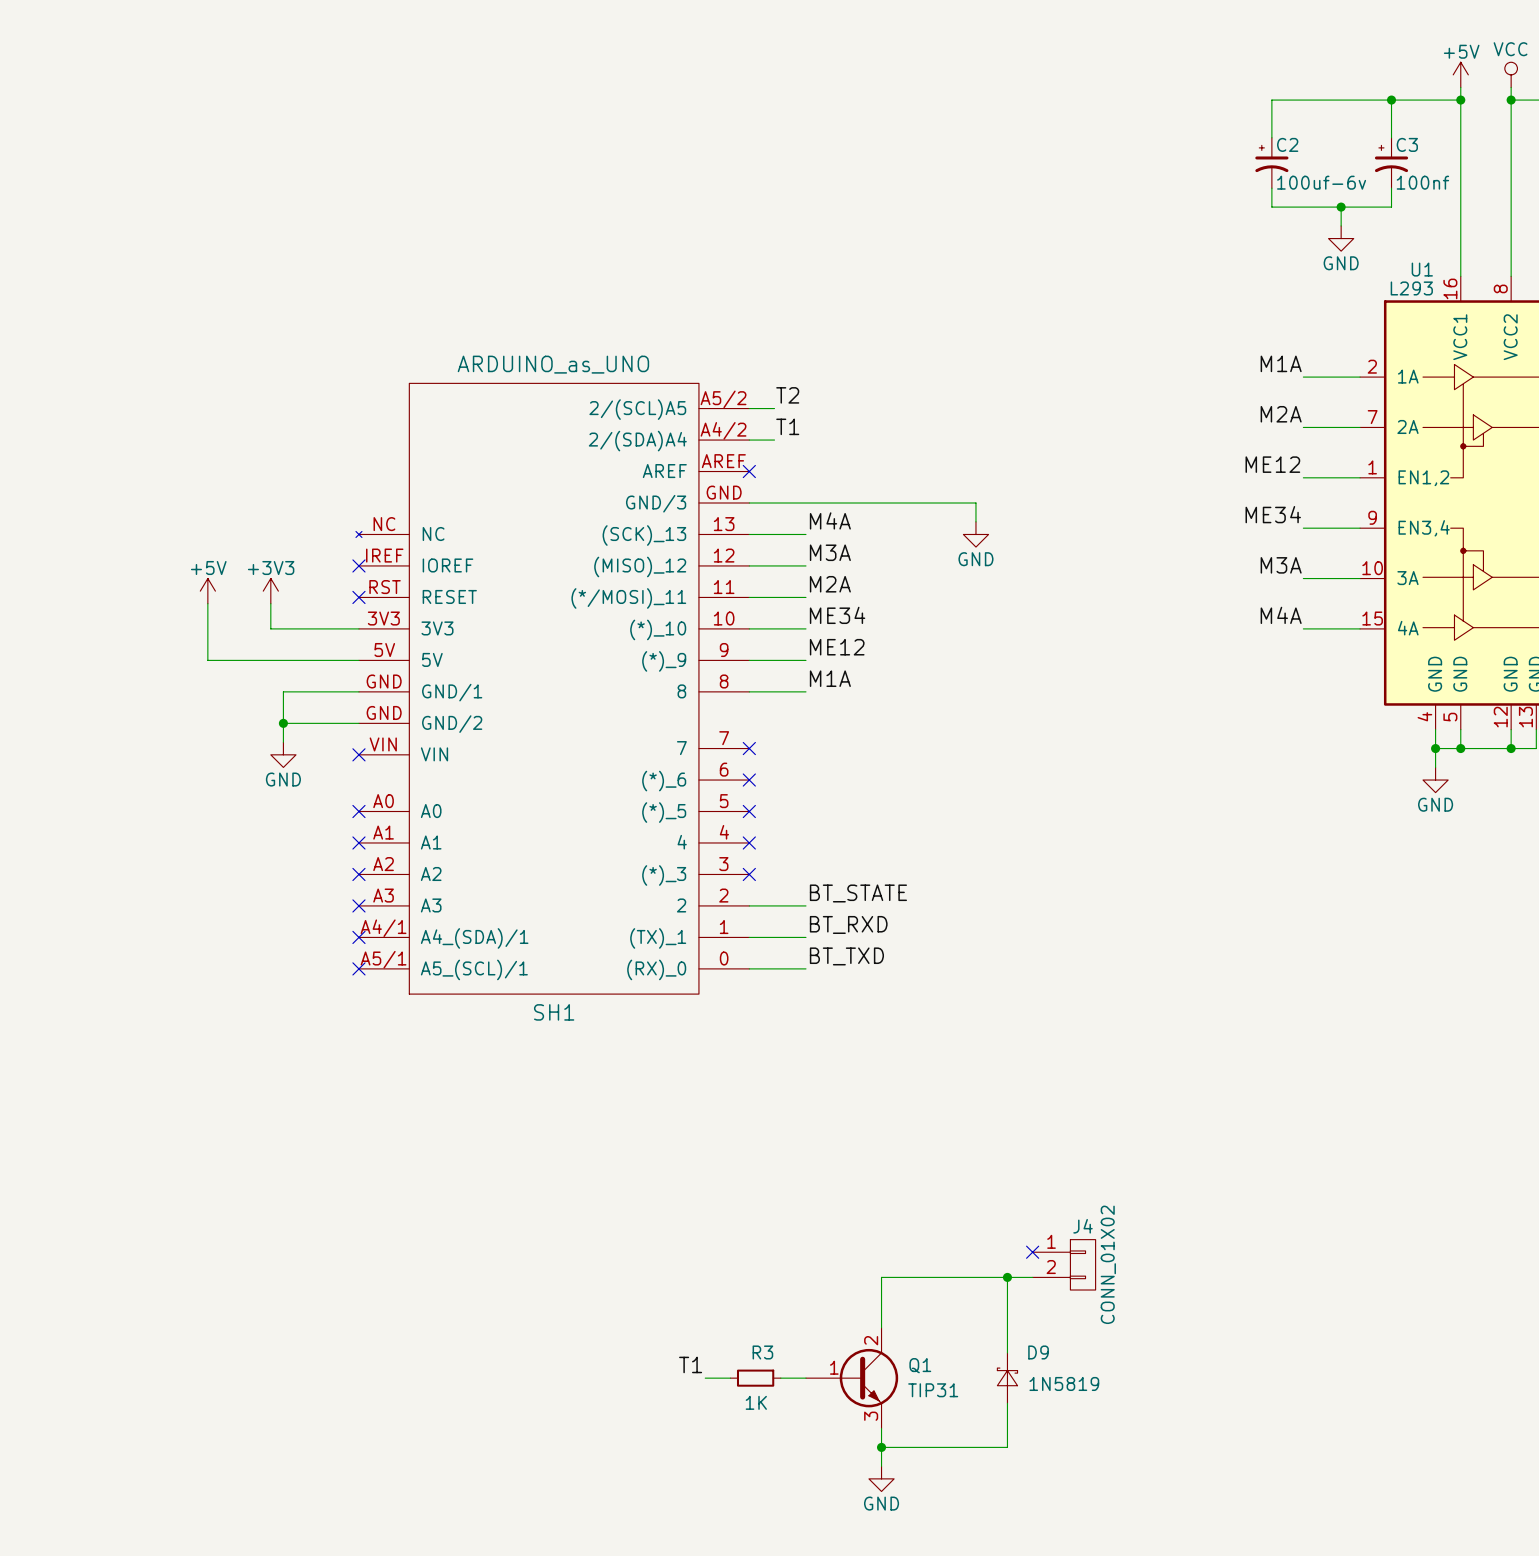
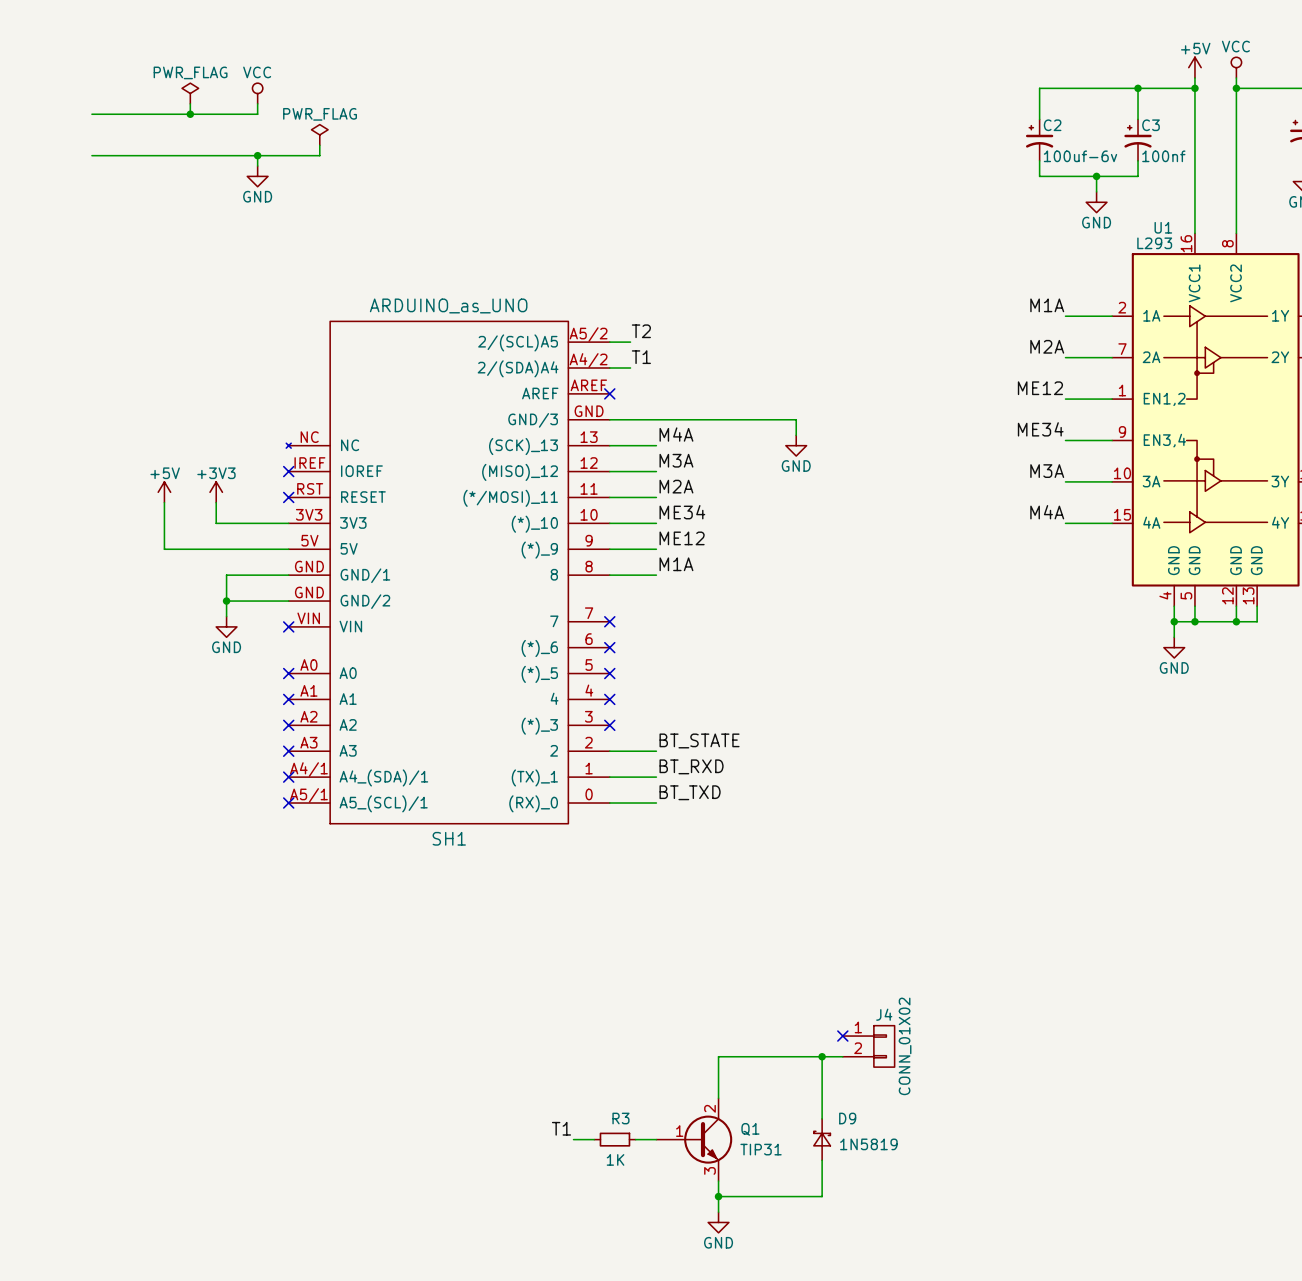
power symbol: none -> PWR_FLAG (190, 93)
power symbol: none -> VCC (257, 93)
wire: none -> (190, 103) (190, 114)
wire: none -> (257, 103) (257, 114) (91, 114)
junction: none -> (190, 114)
power symbol: none -> PWR_FLAG (319, 134)
wire: none -> (319, 145) (319, 155) (91, 155)
wire: none -> (257, 155) (257, 166)
junction: none -> (257, 155)
power symbol: none -> GND (257, 176)

